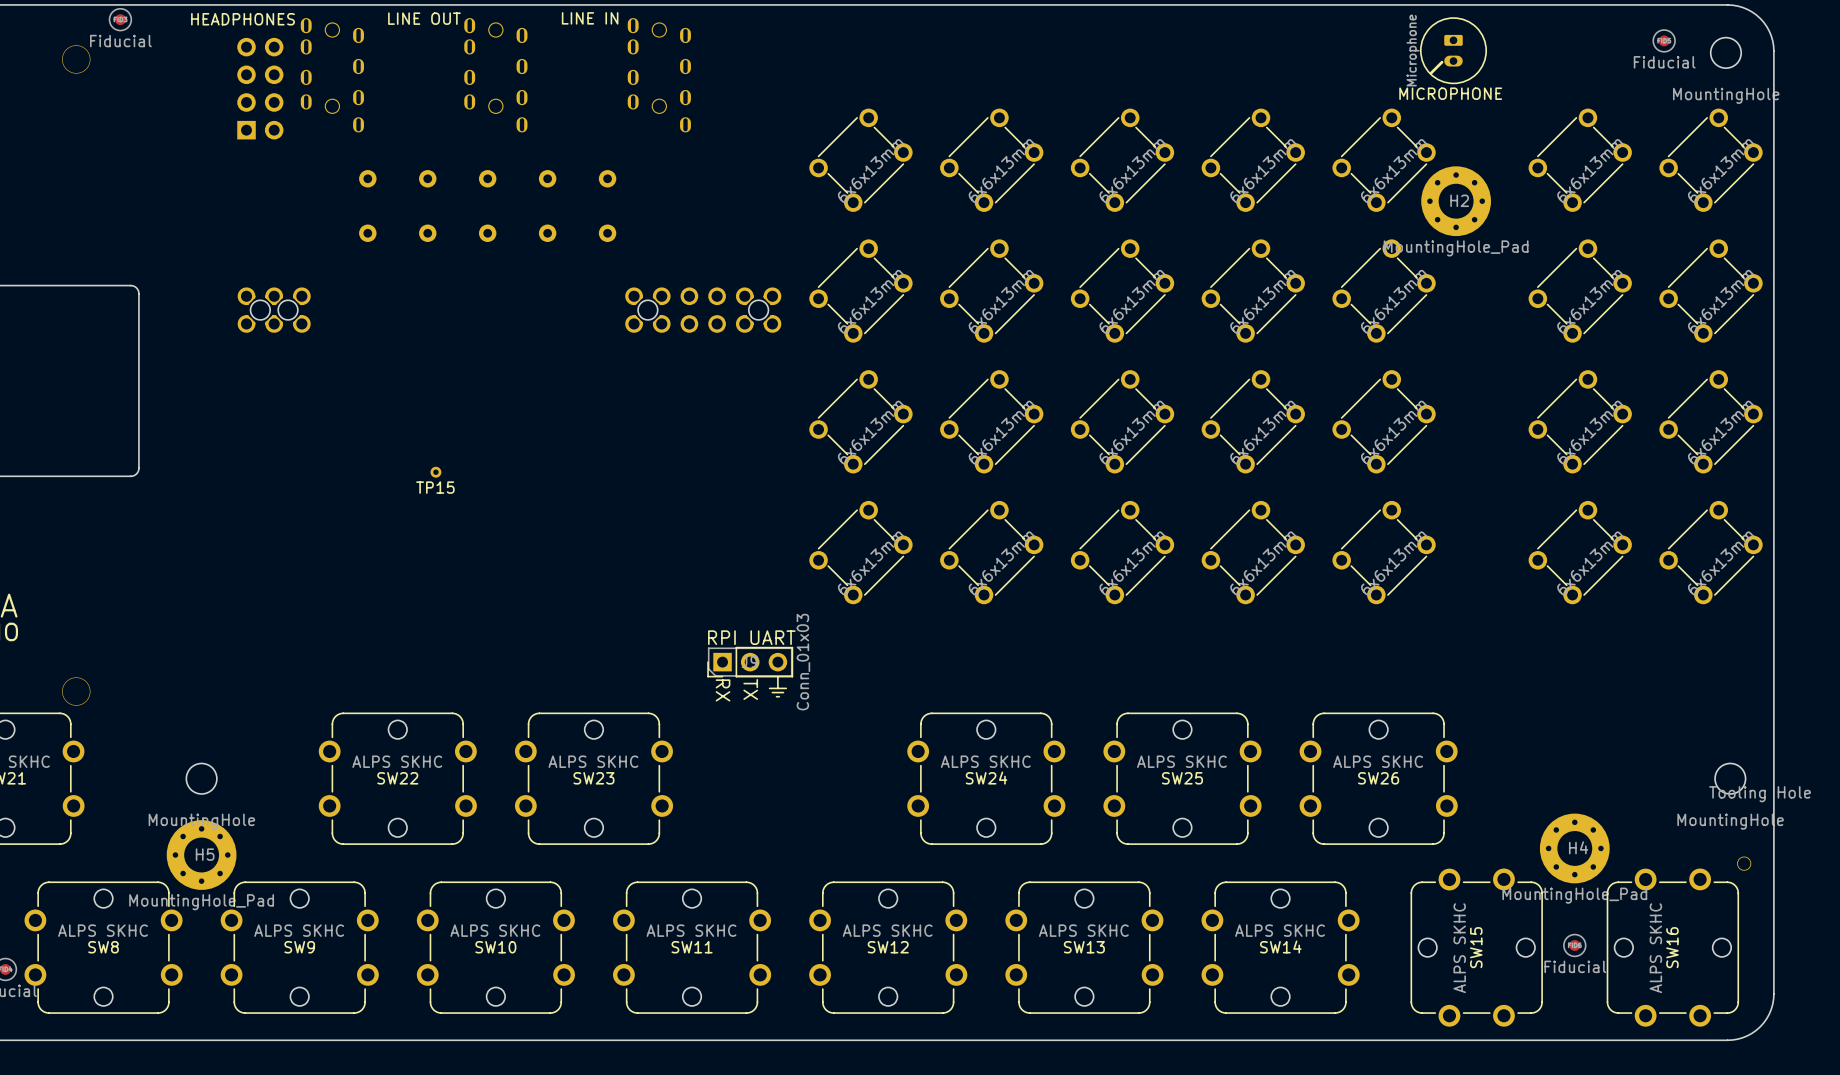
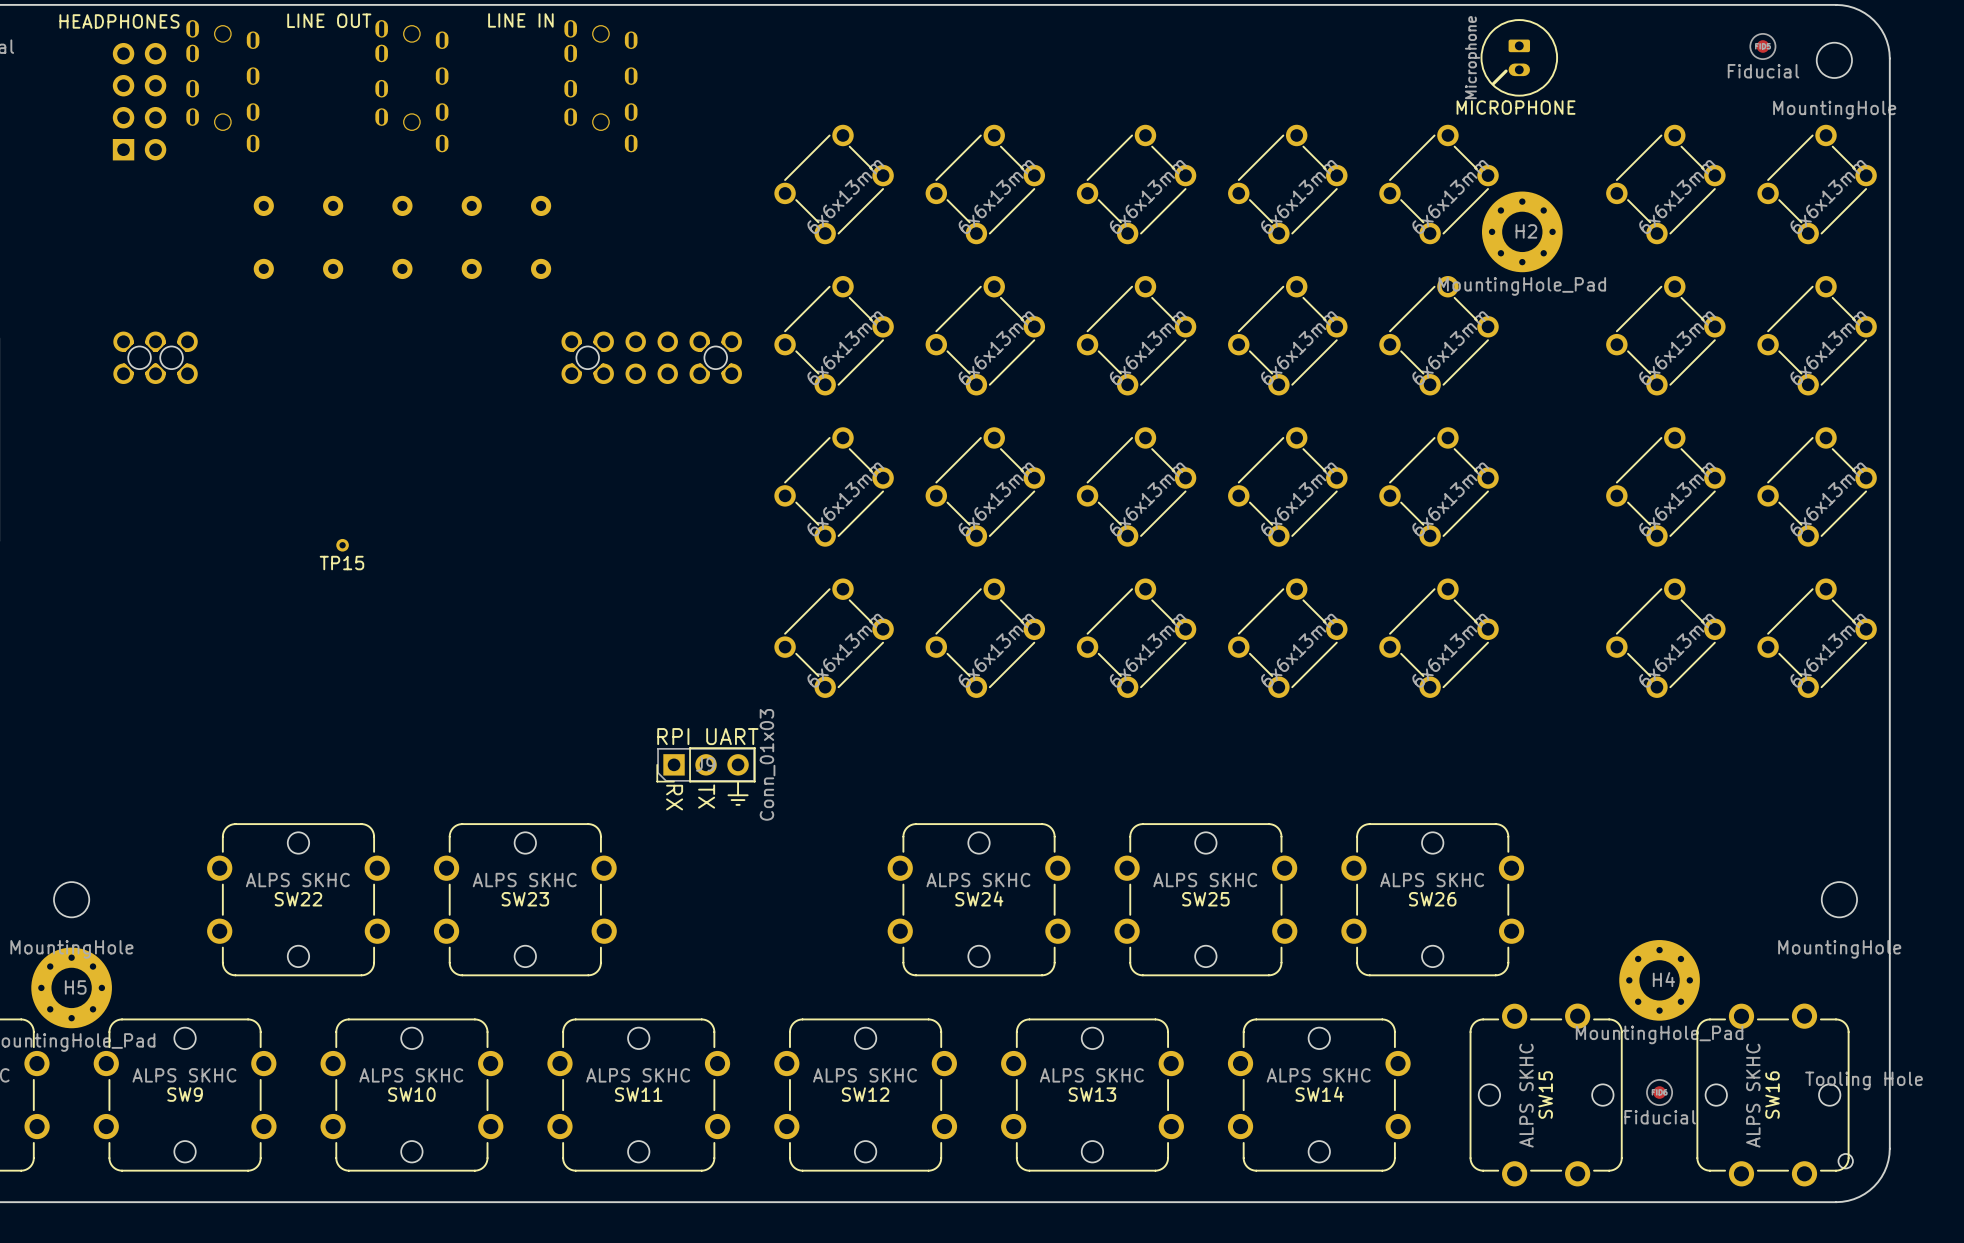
part: Tooling Hole (1744, 863) -> none
part: none -> Tooling Hole (1845, 1161)

